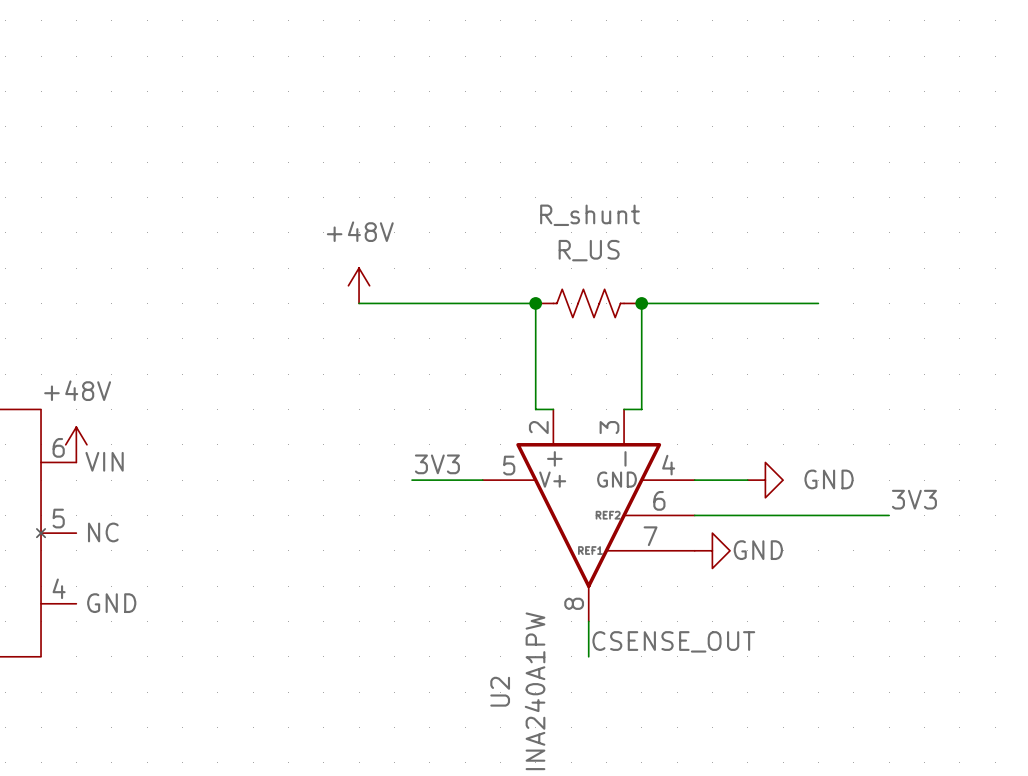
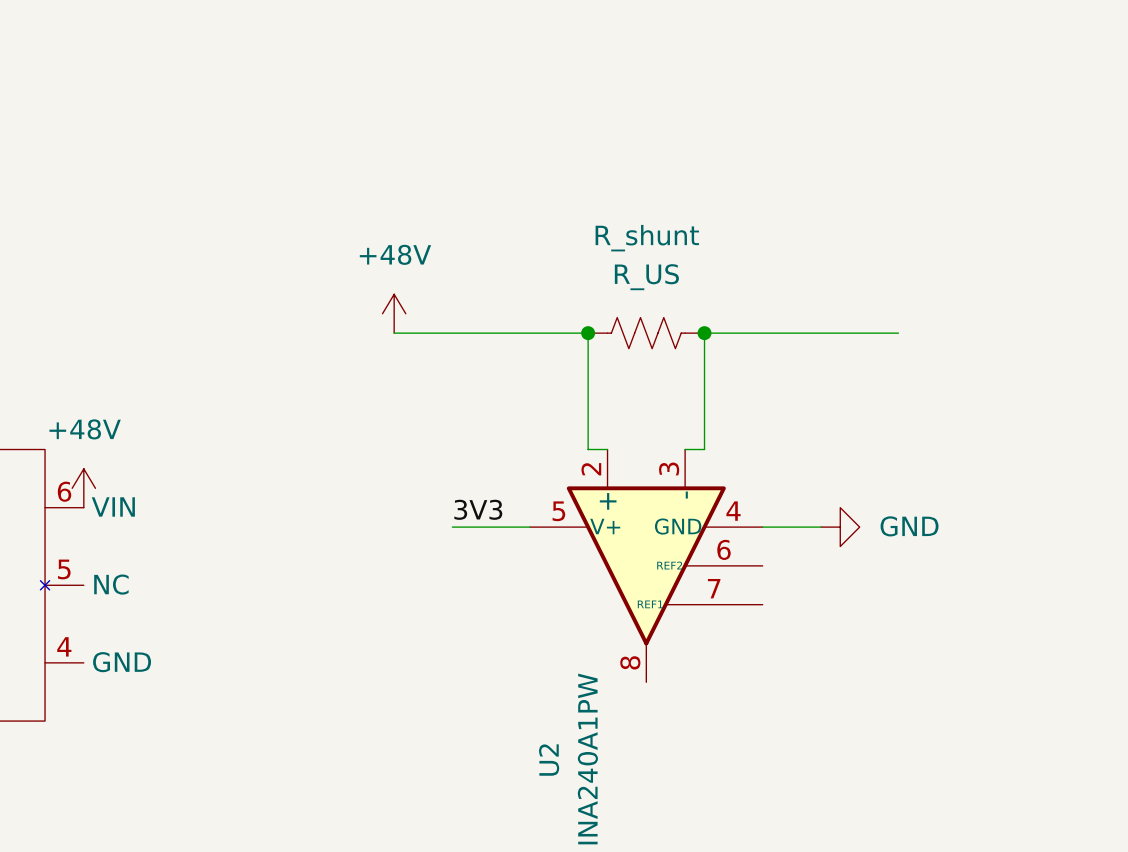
label: 3V3 (914, 499) -> none
wire: (694, 515) (889, 515) -> none
power symbol: GND (712, 550) -> none
wire: (588, 621) (588, 656) -> none
label: CSENSE_OUT (673, 641) -> none

